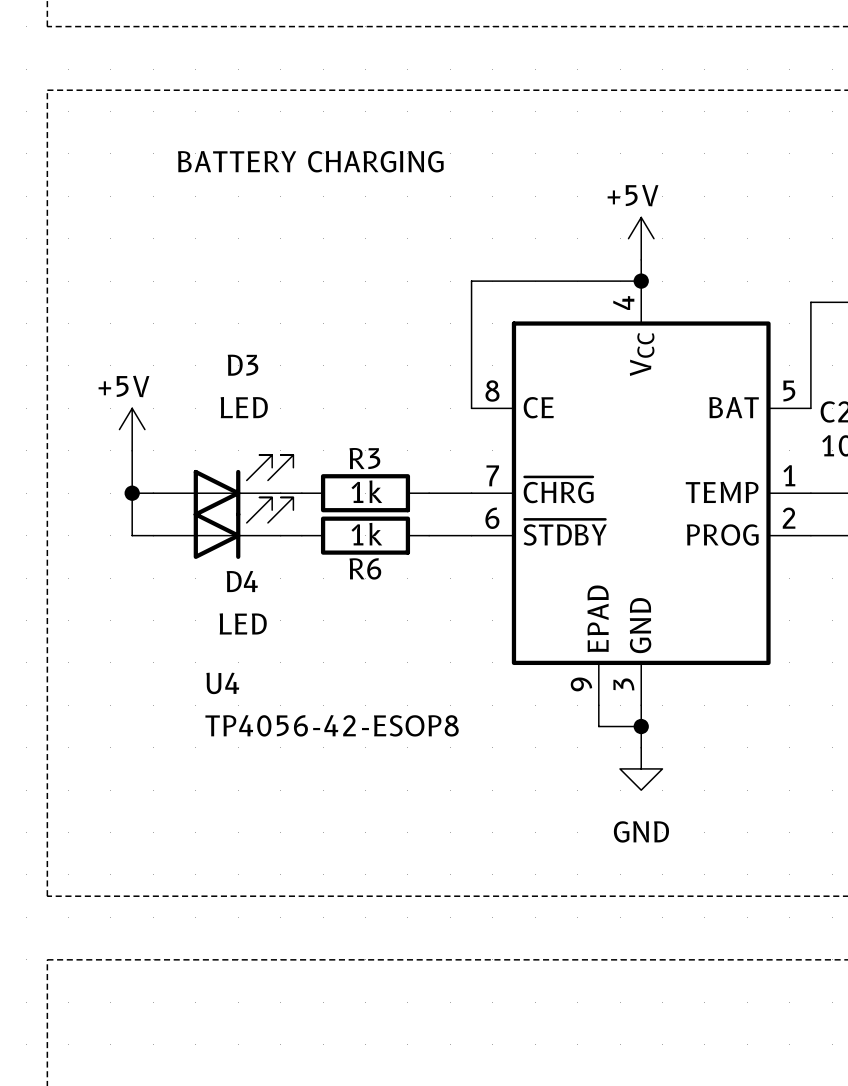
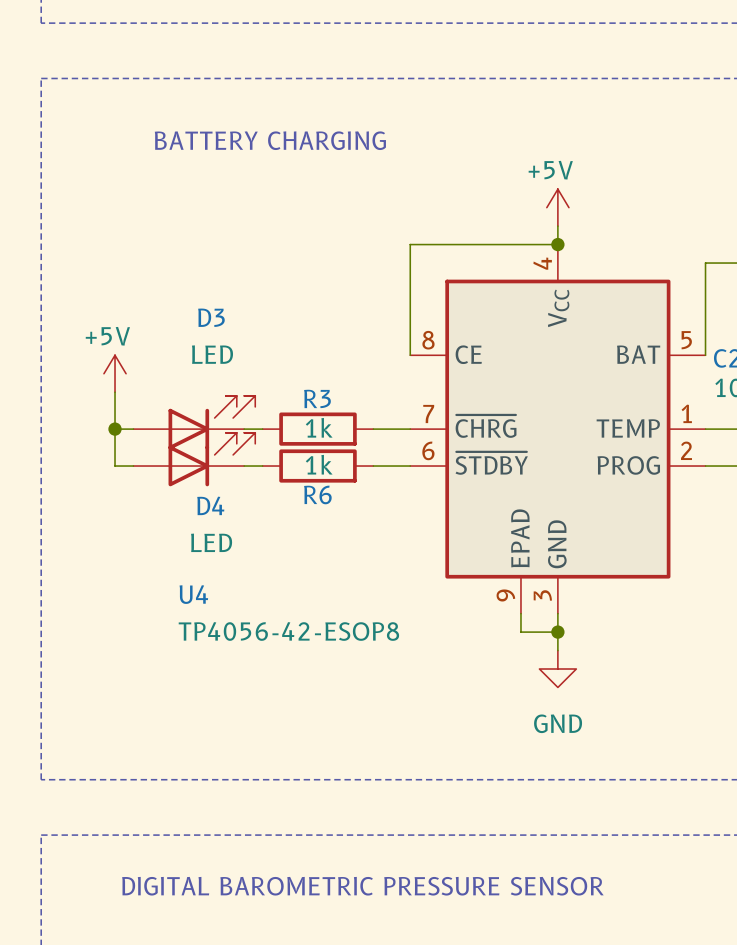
text: none -> DIGITAL BAROMETRIC PRESSURE SENSOR (362, 886)

